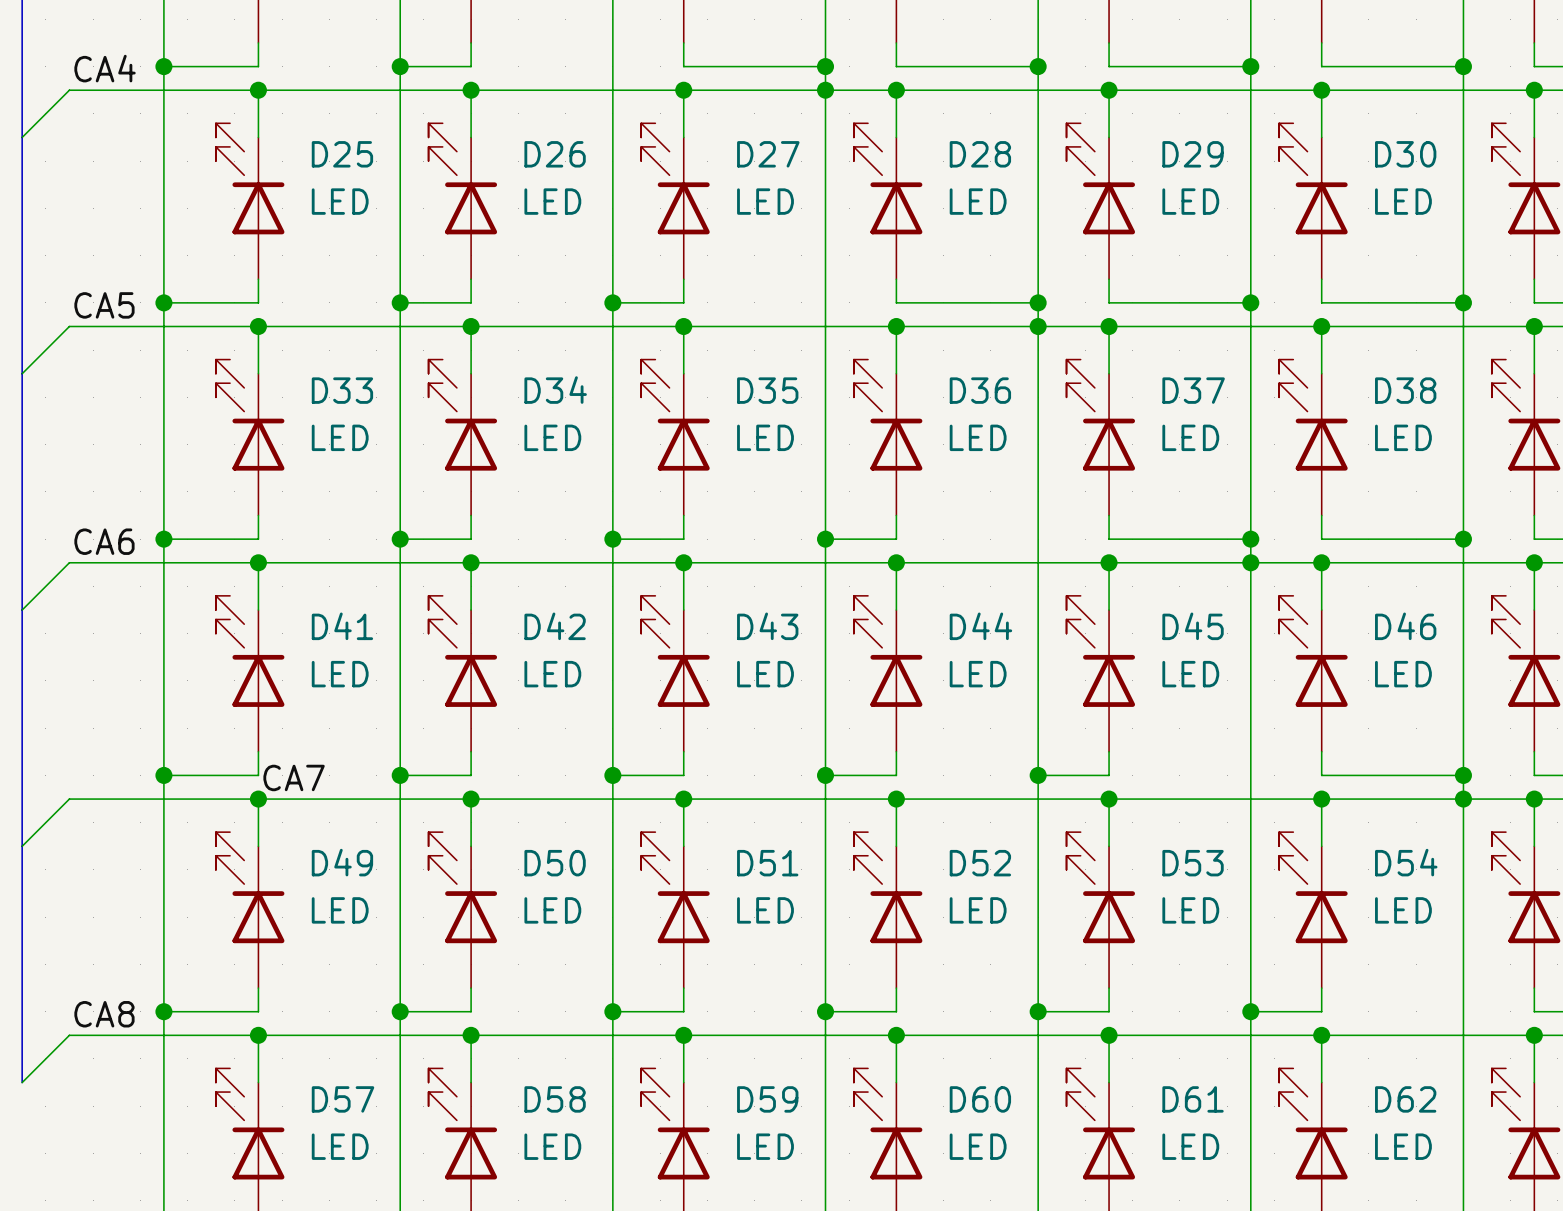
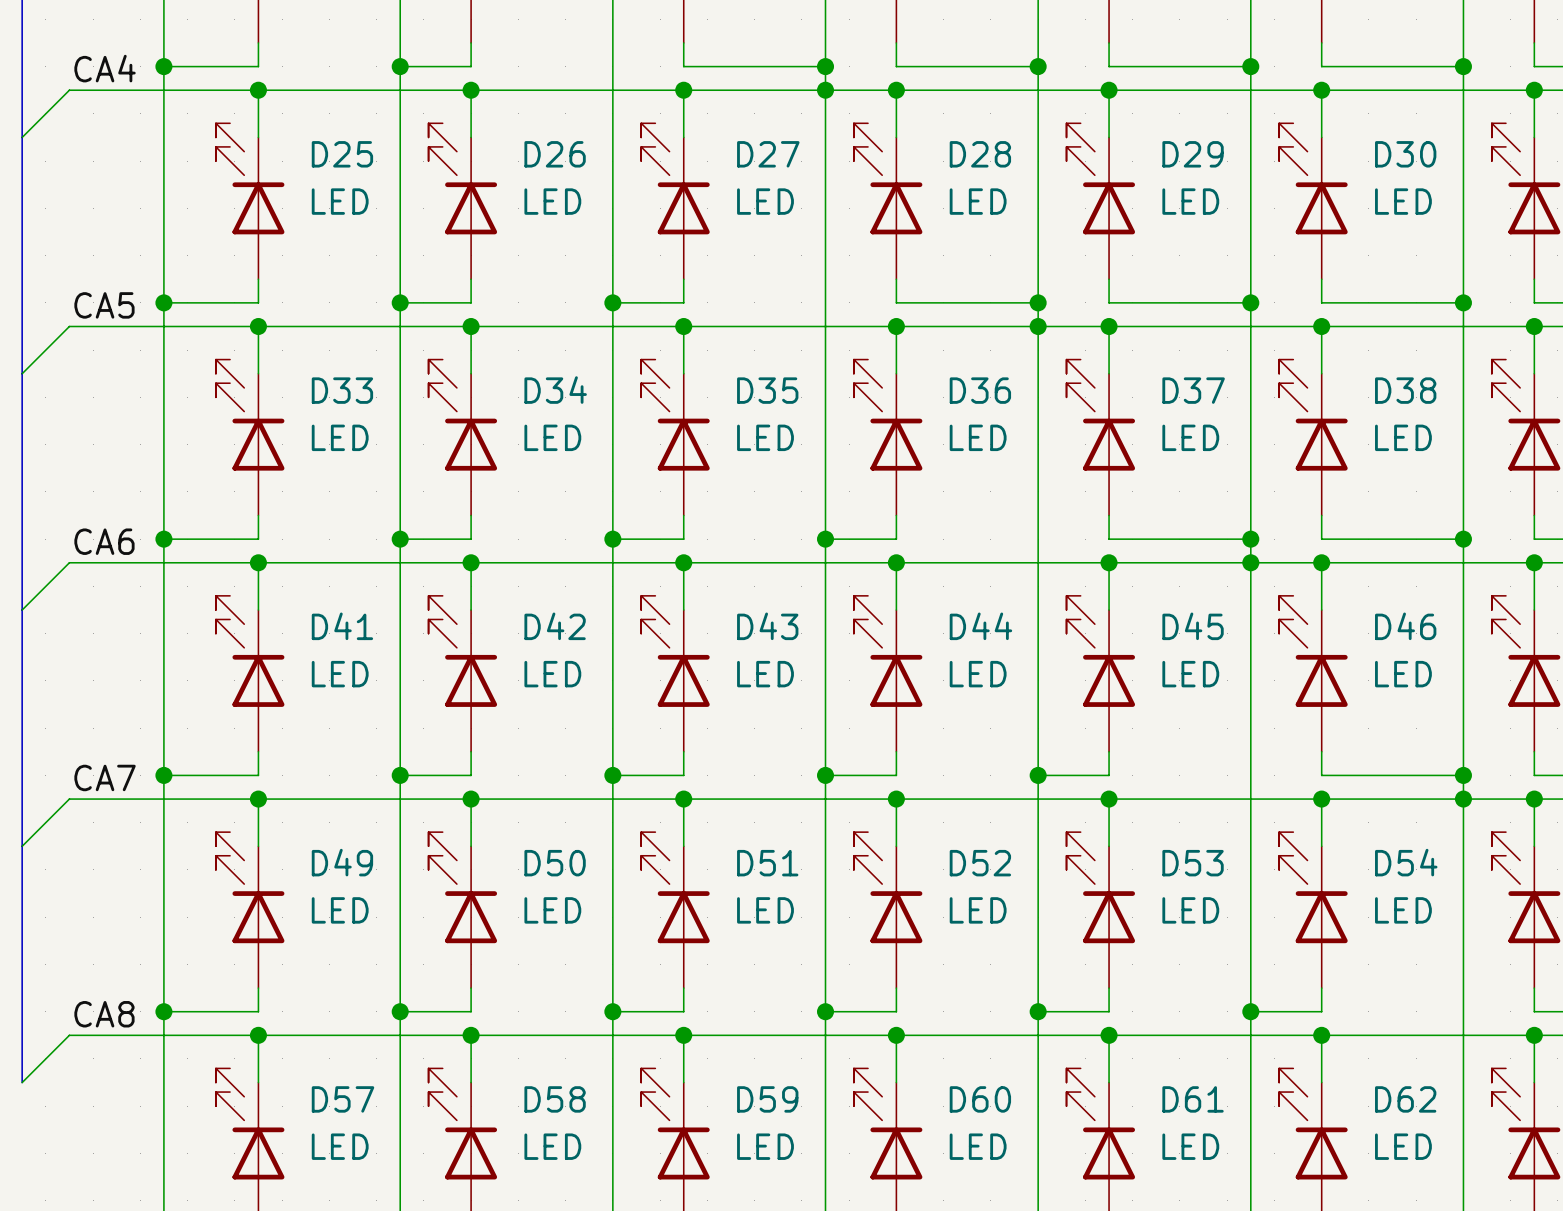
label position: CA7 (294, 777) -> CA7 (105, 777)

